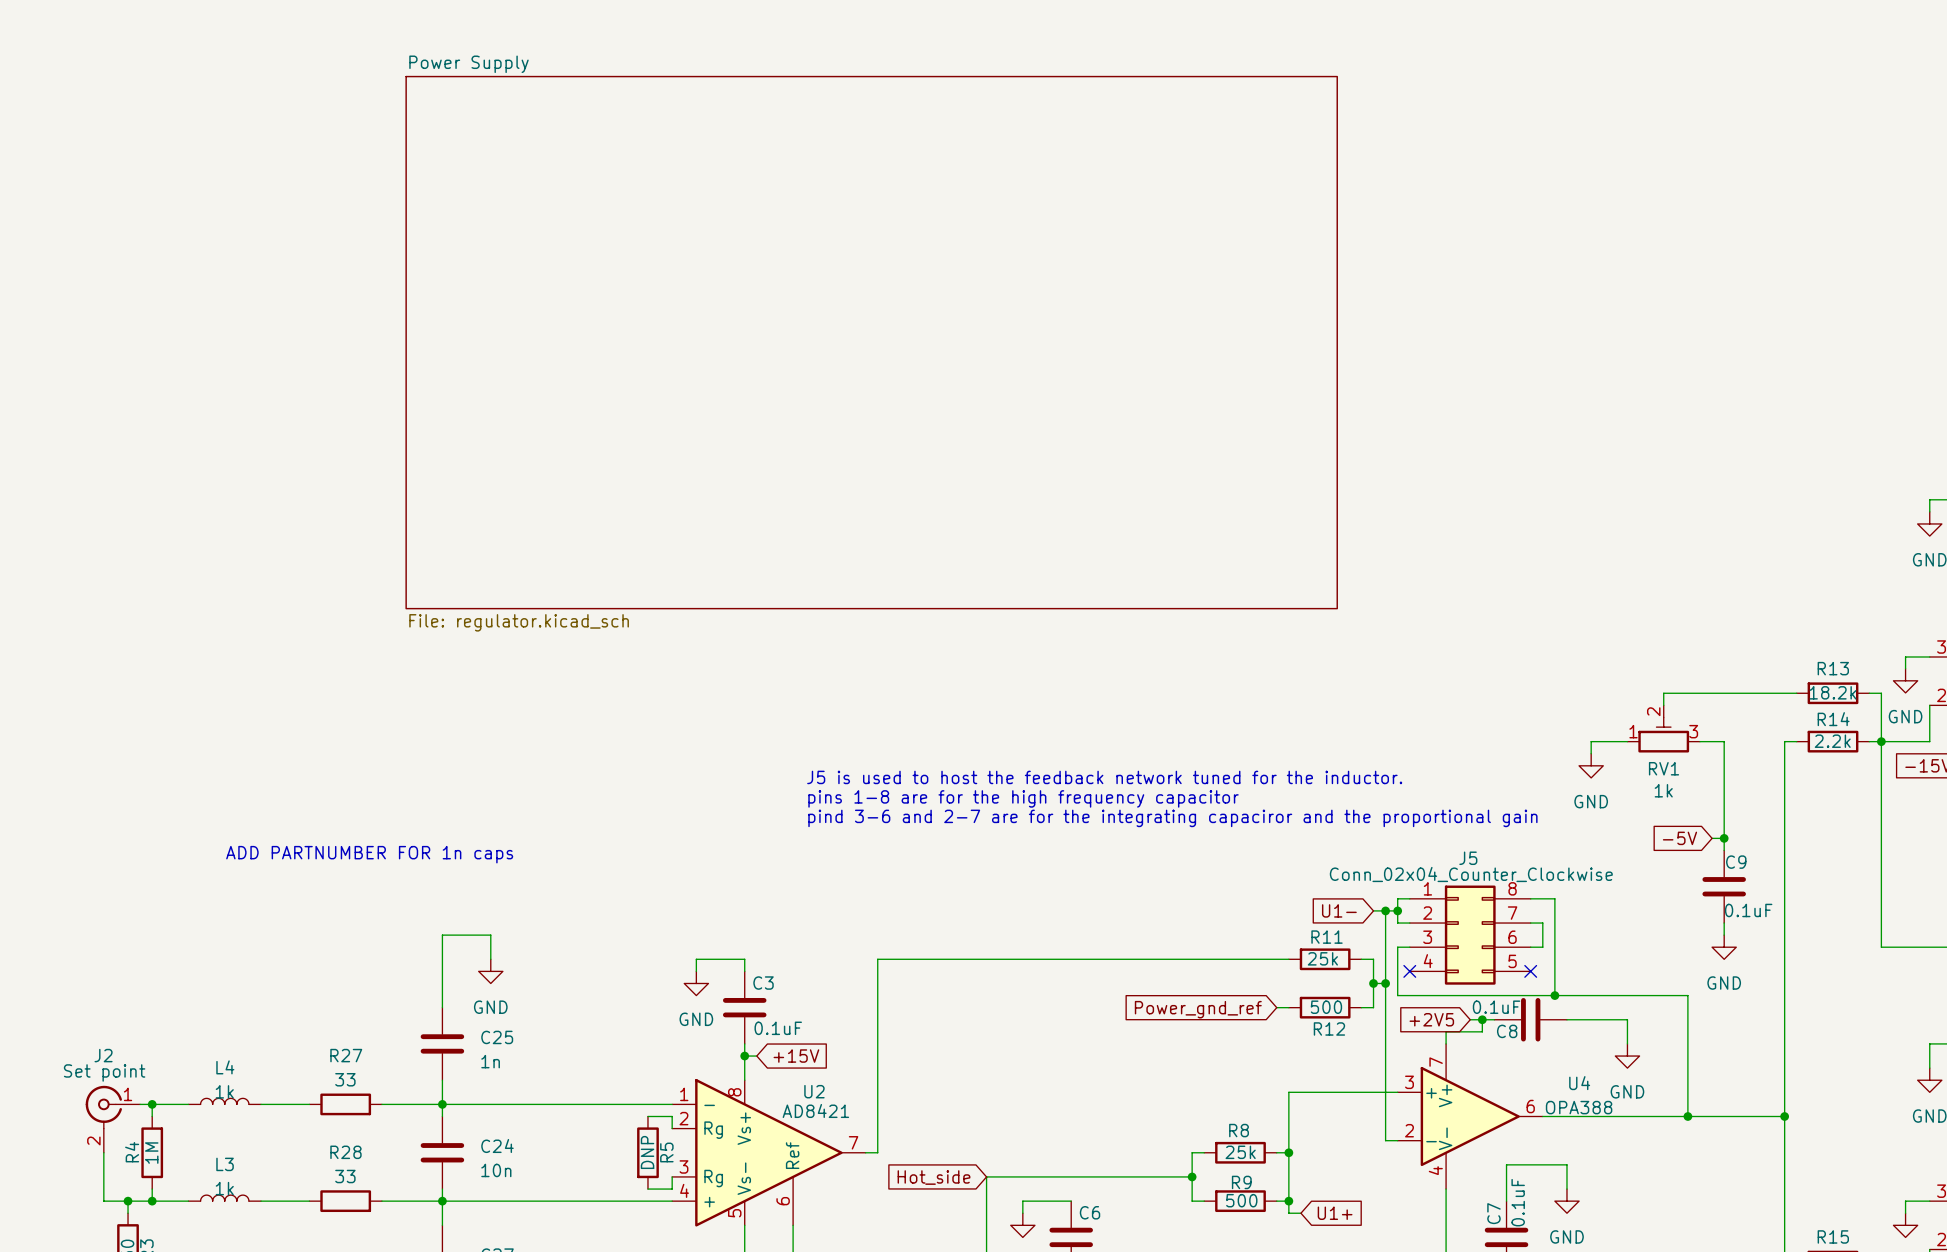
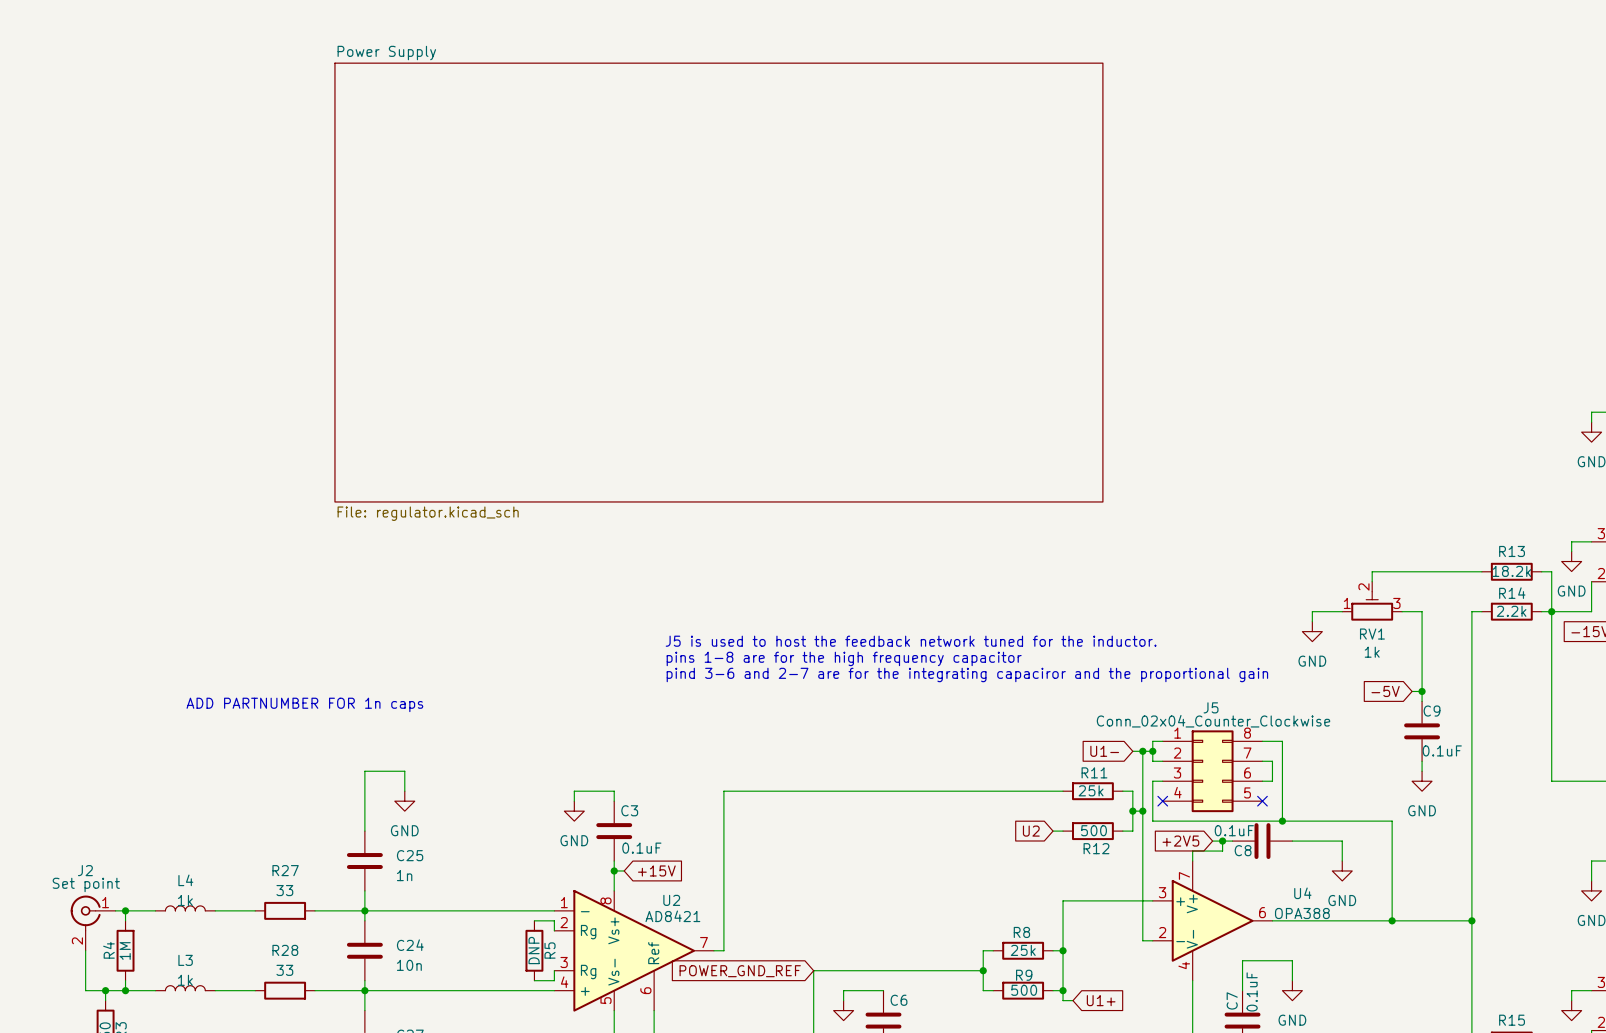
global label: Power_gnd_ref (1198, 1009) -> U2 (1031, 831)
global label: Hot_side (934, 1177) -> POWER_GND_REF (740, 971)

